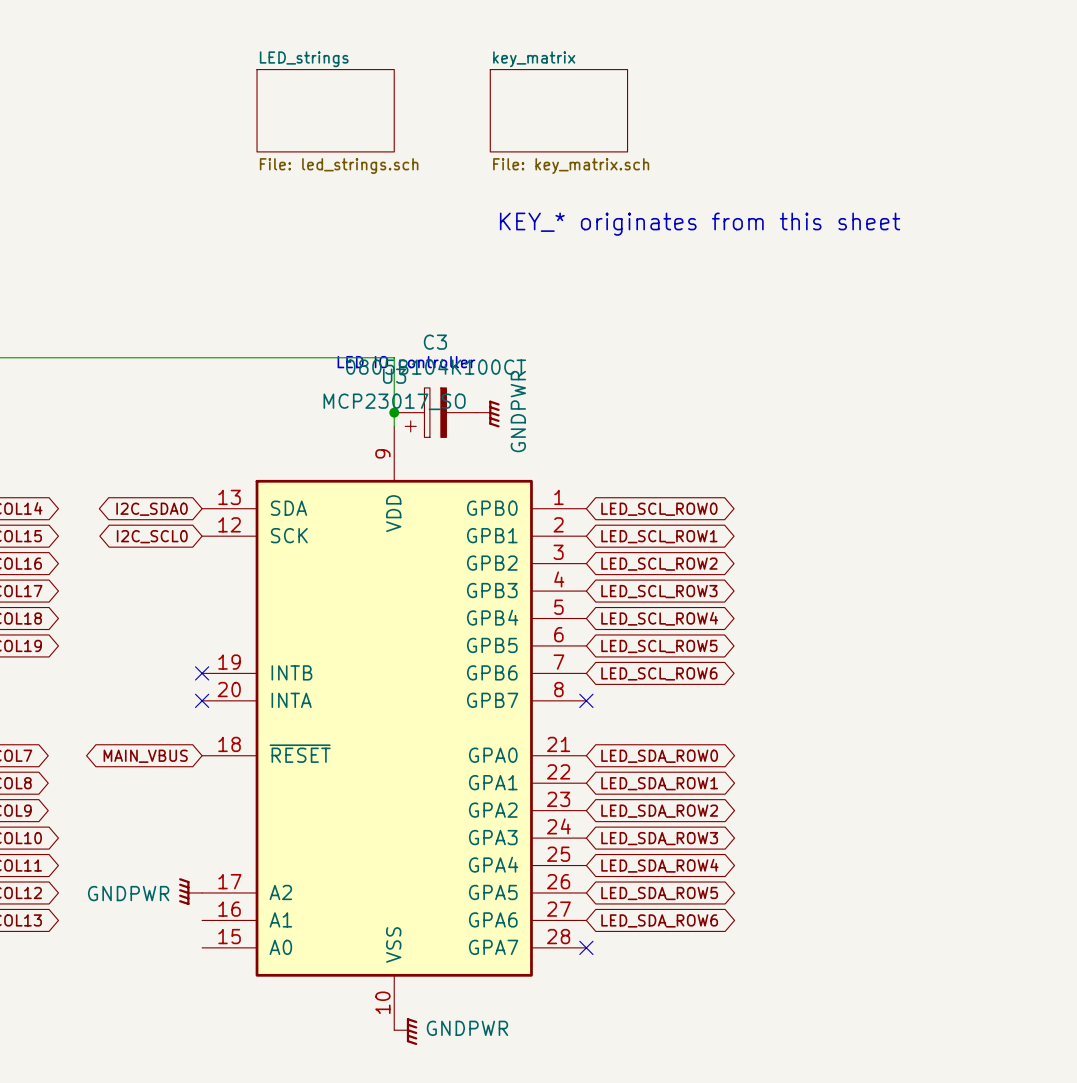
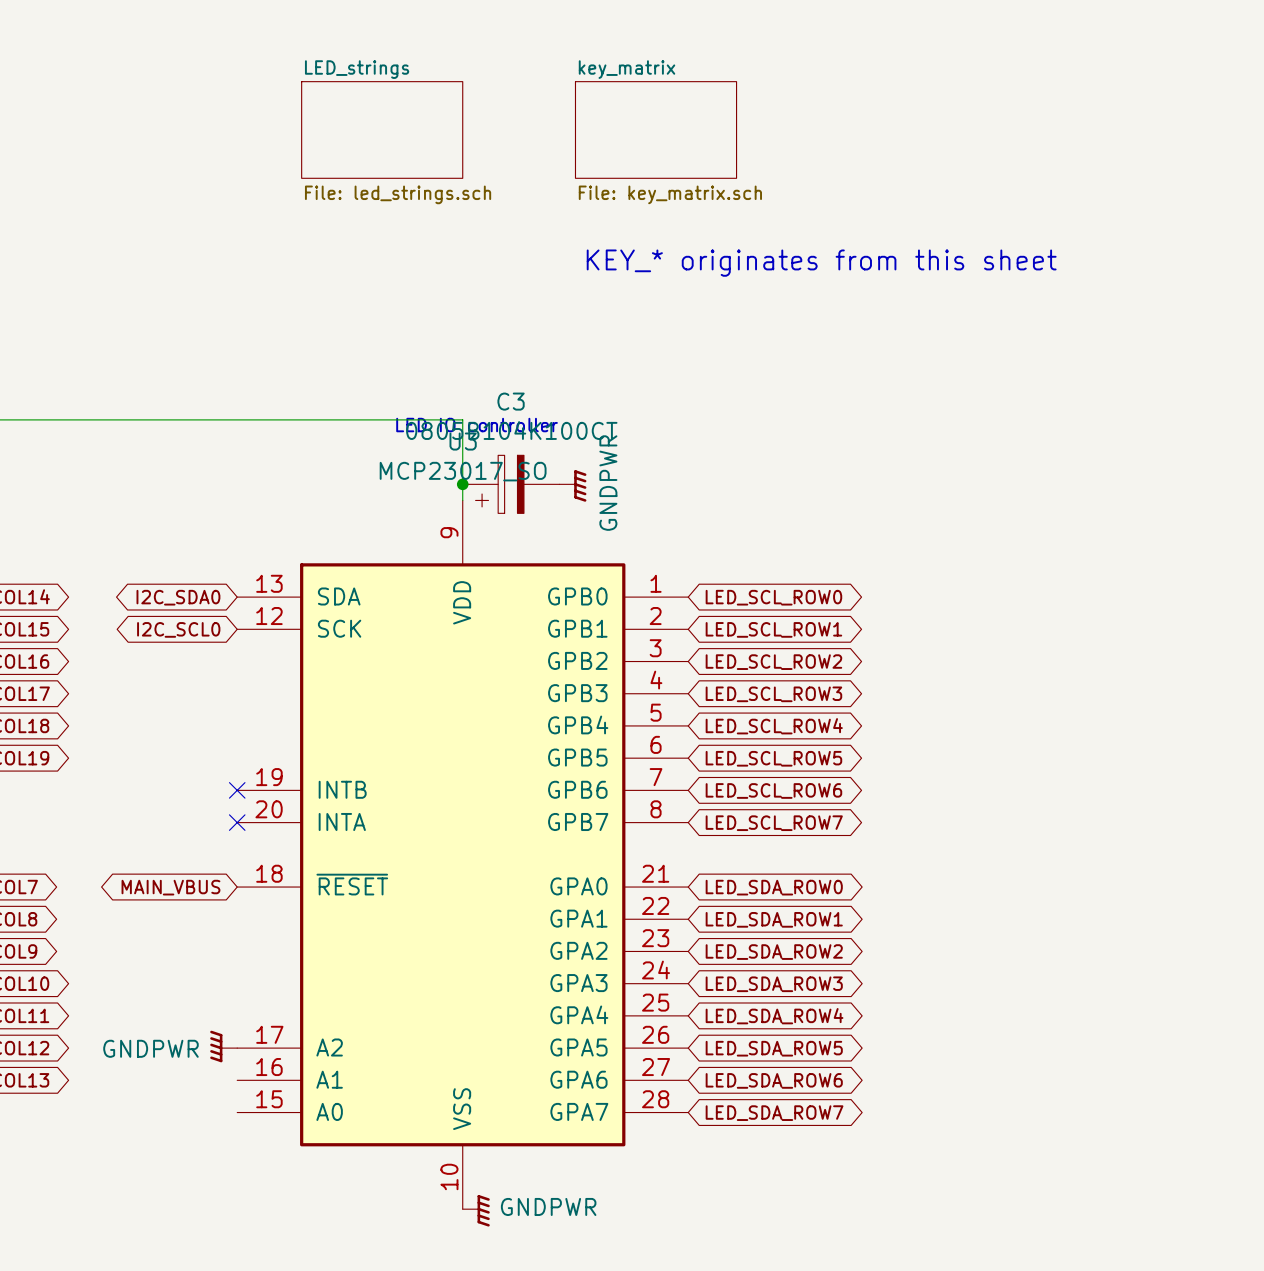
no-connect mark: (586, 700) -> none
global label: none -> LED_SCL_ROW7 (774, 823)
no-connect mark: (586, 947) -> none
global label: none -> LED_SDA_ROW7 (774, 1113)

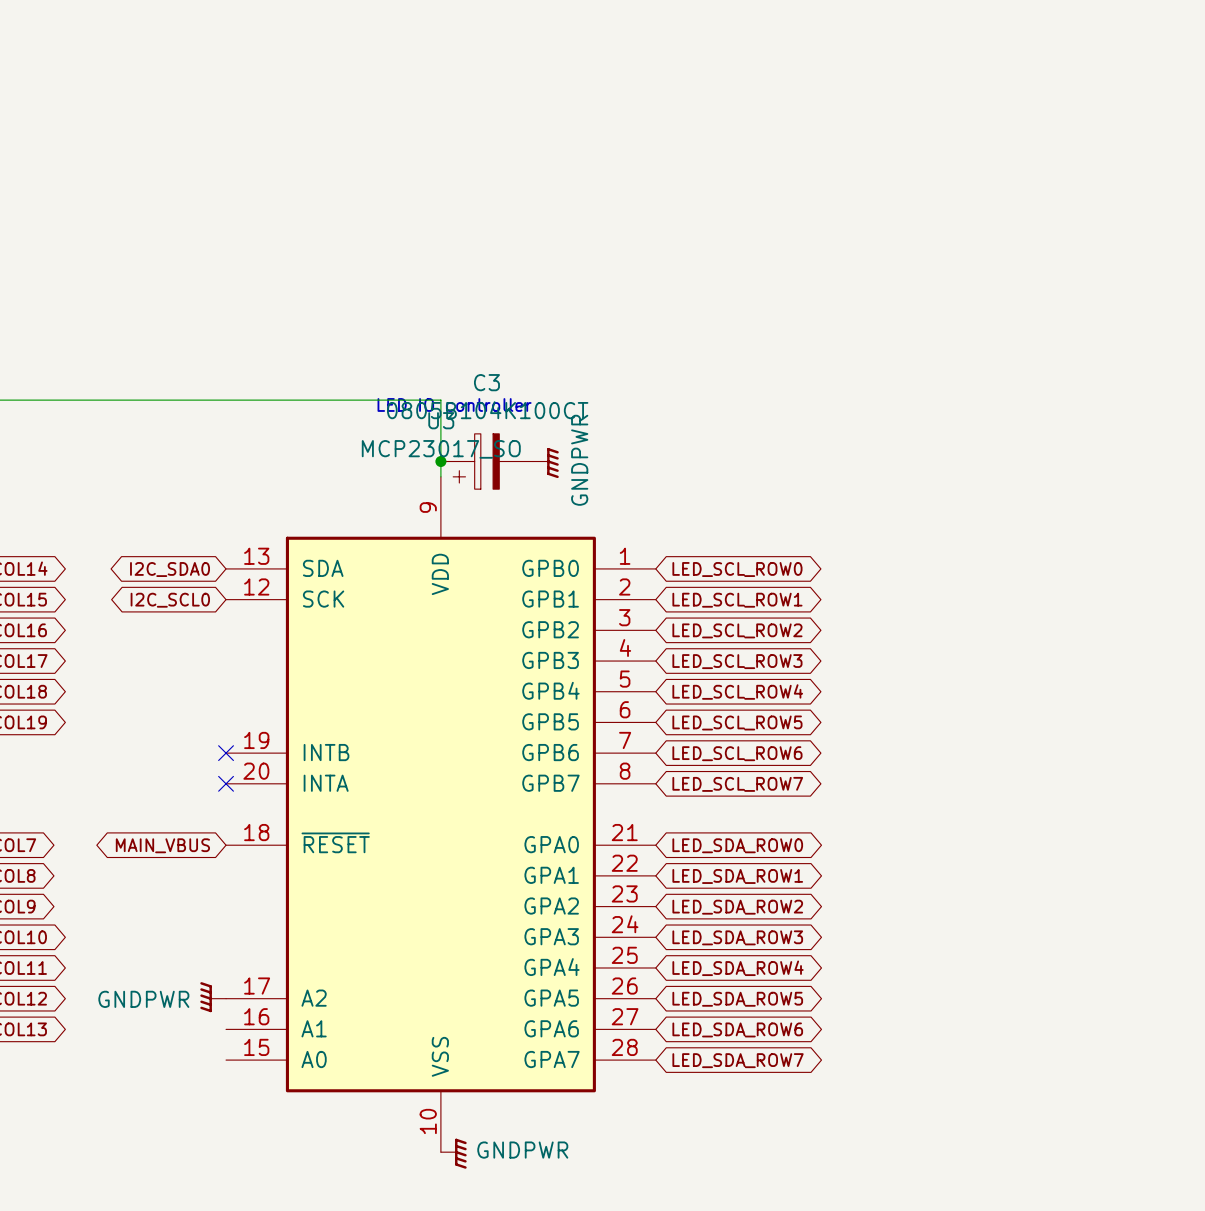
sheet LED_strings: File: led_strings.sch (382, 129) -> none
sheet key_matrix: File: key_matrix.sch (656, 129) -> none
text: KEY_* originates from this sheet (821, 263) -> none

